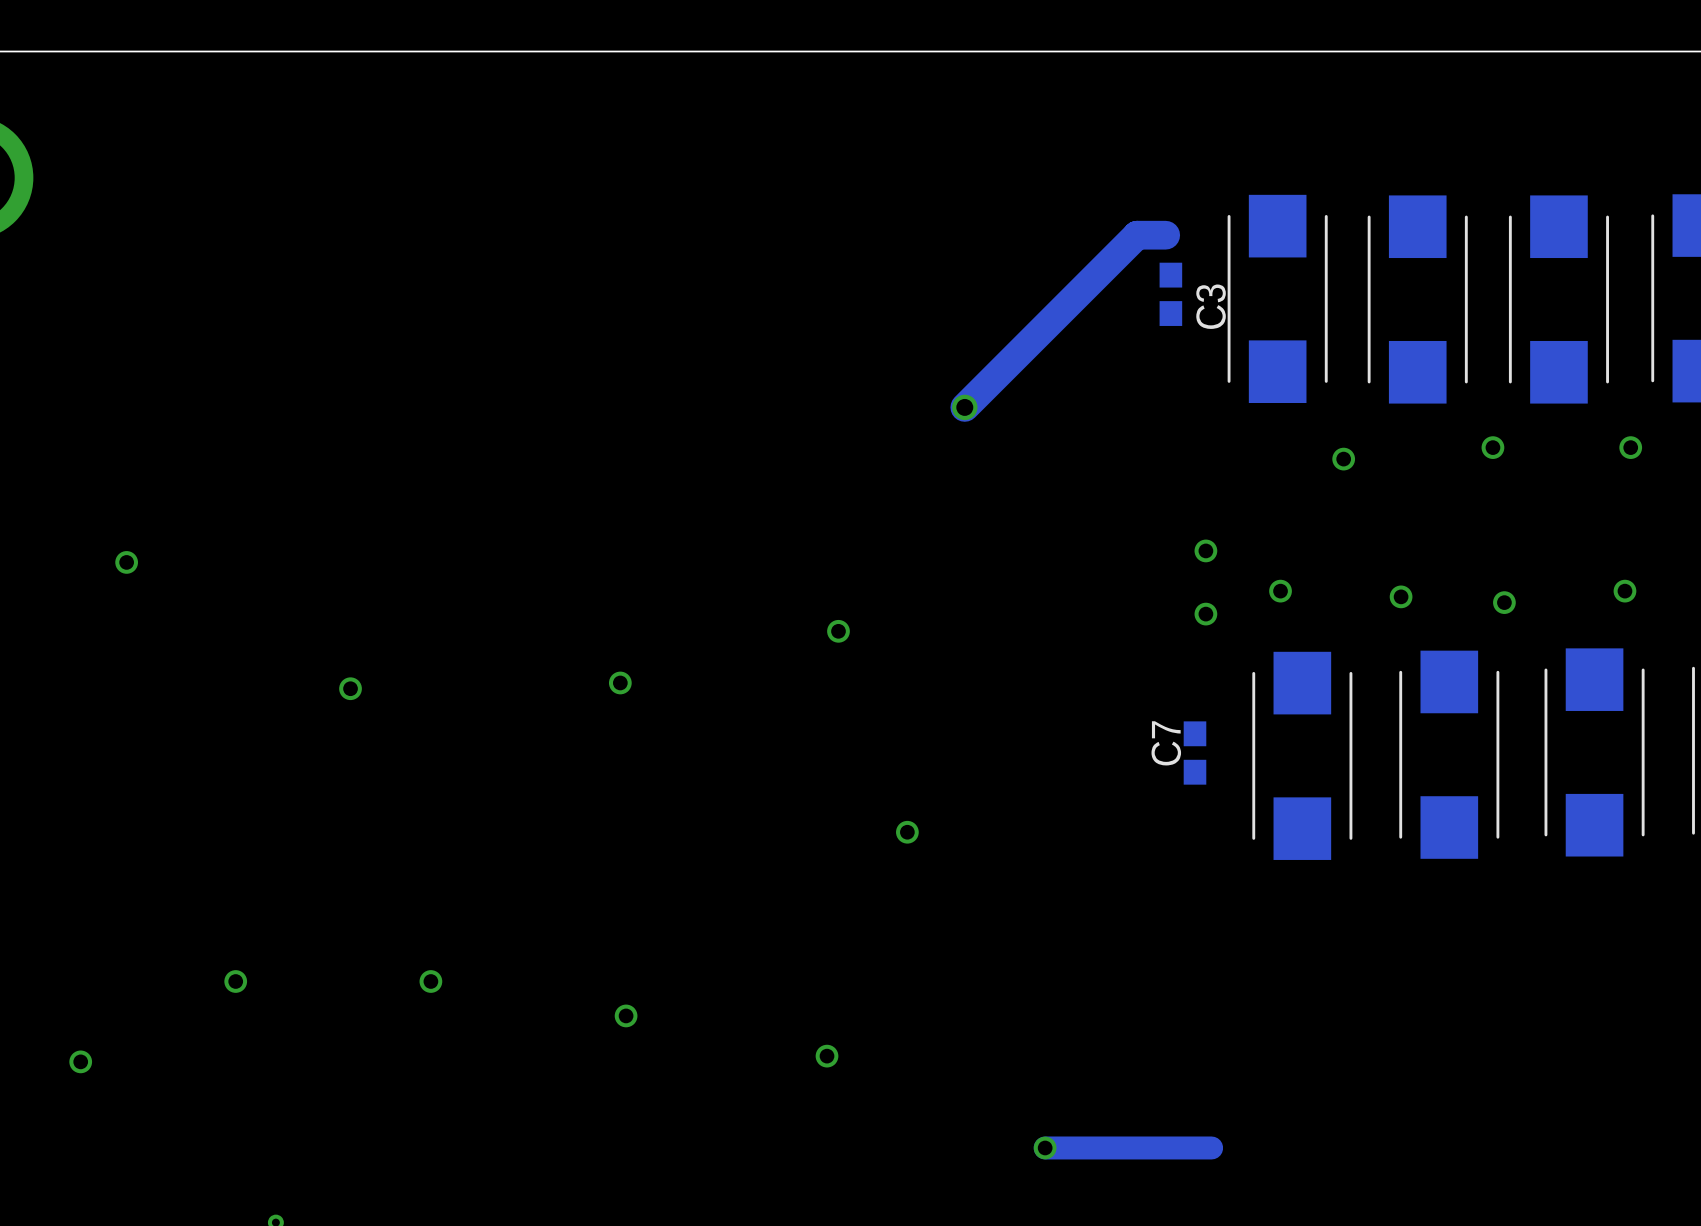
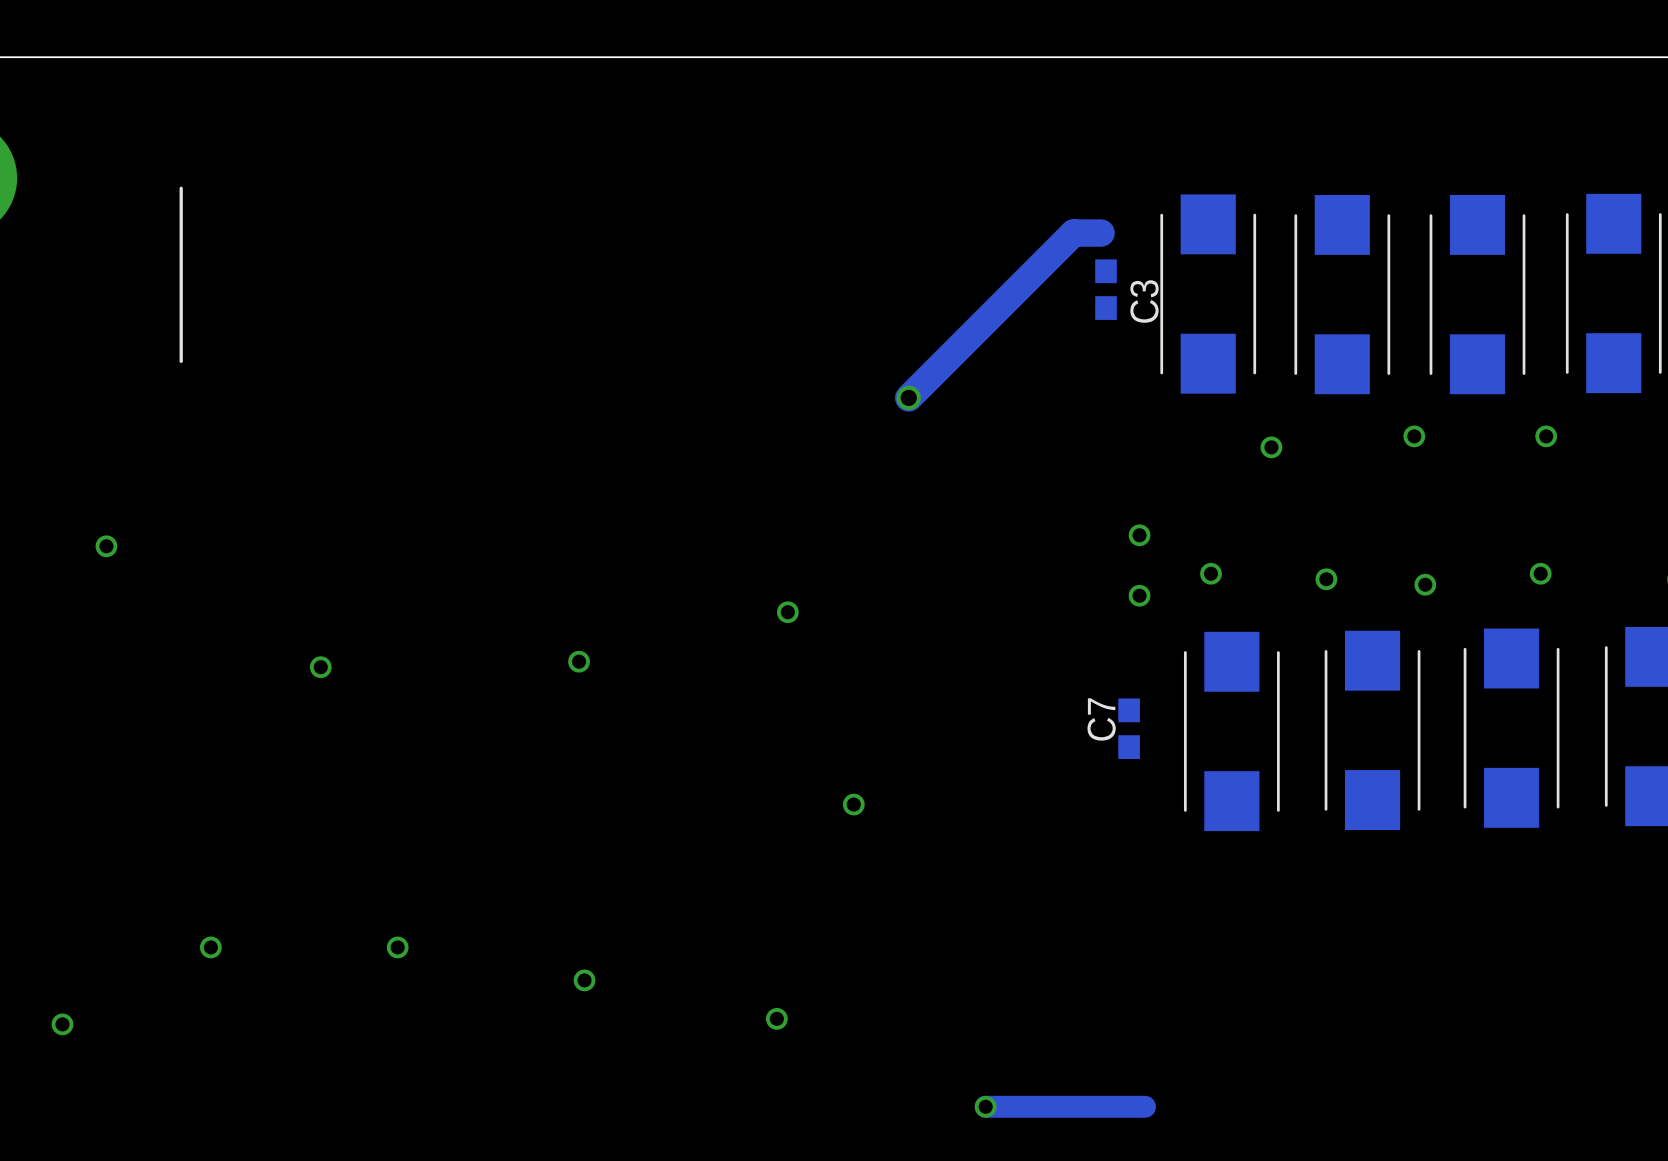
part: none -> (181, 274)

